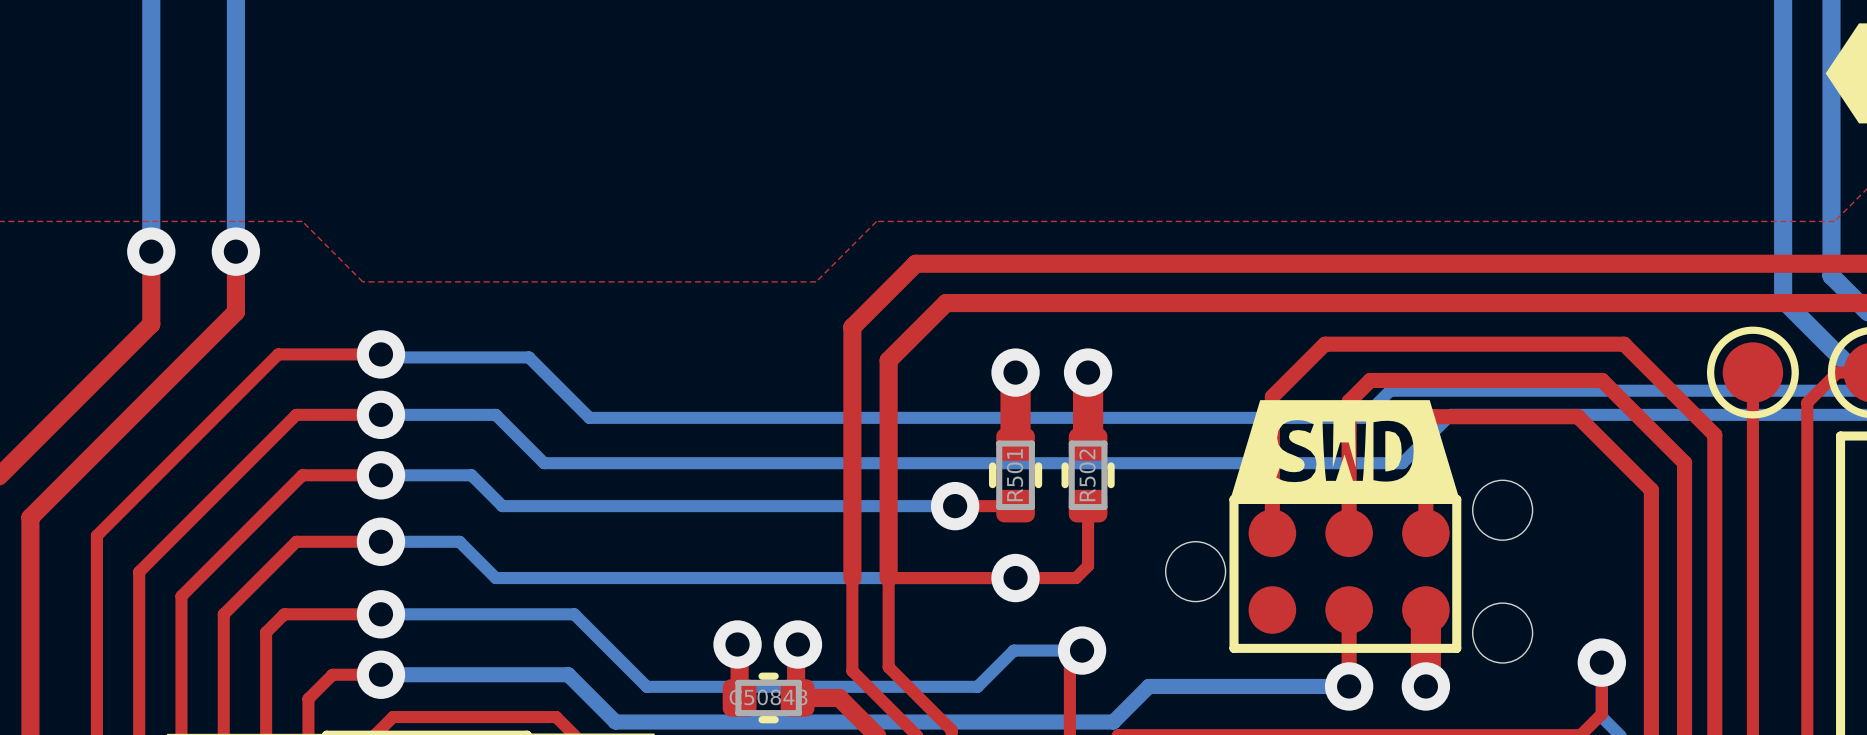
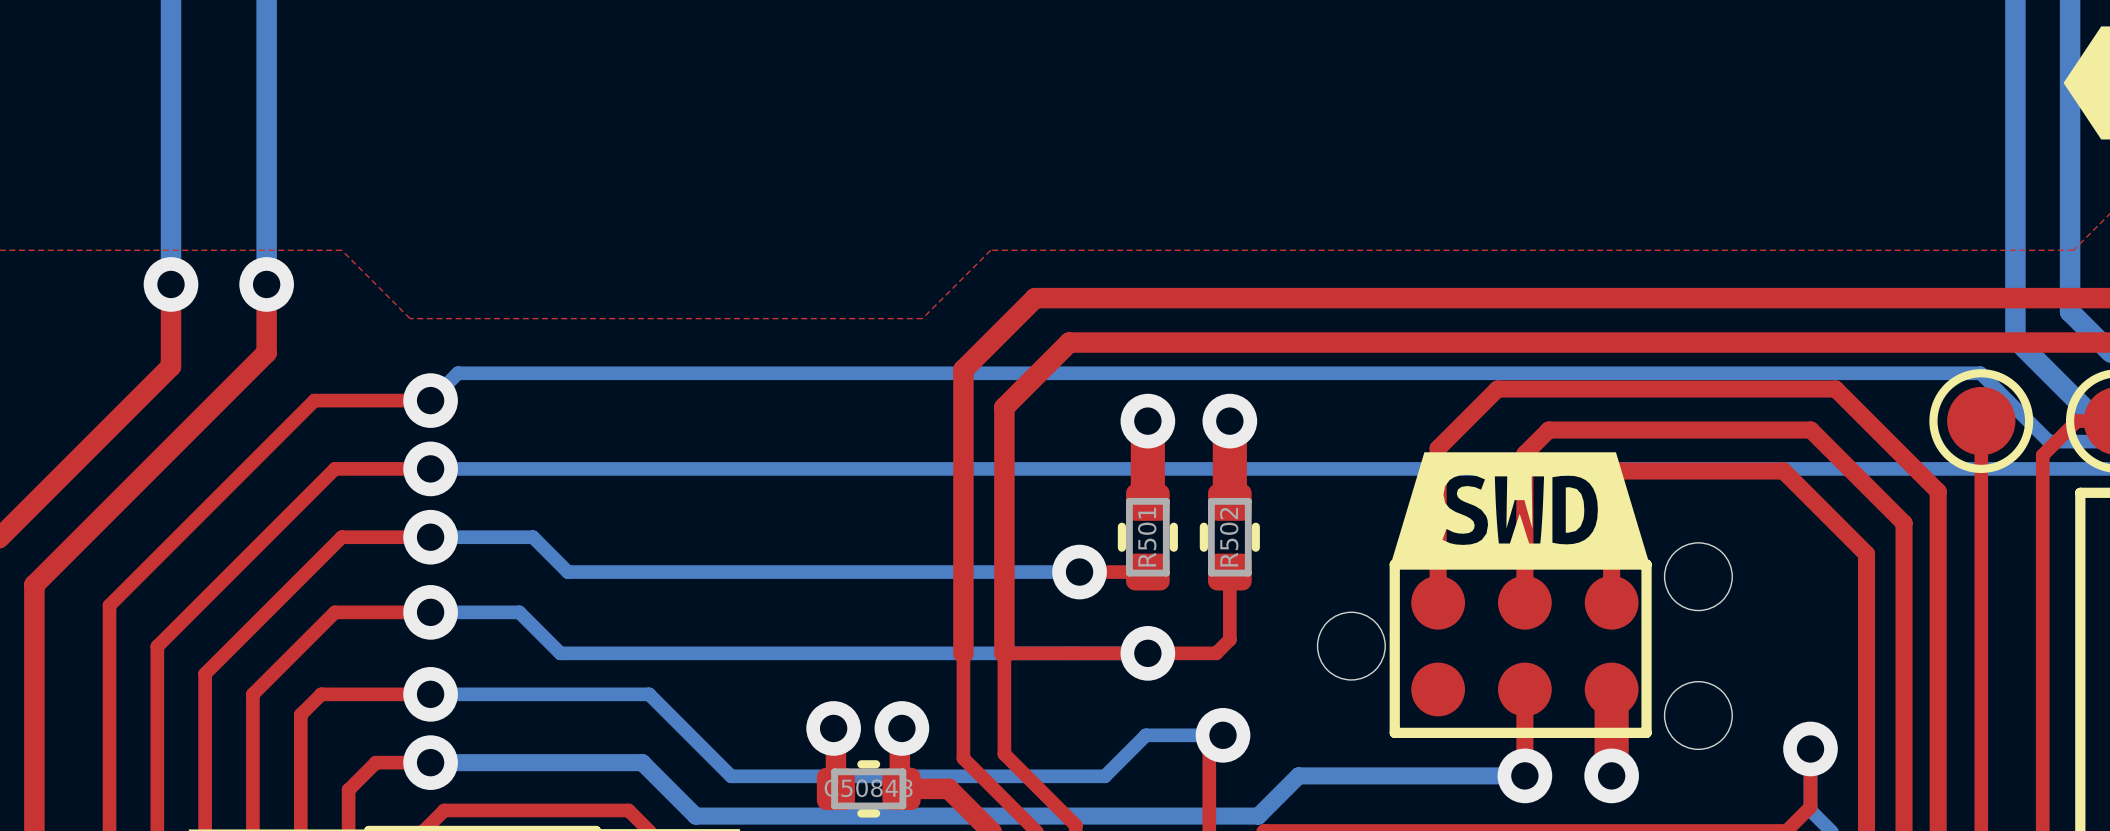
bottom track: (380, 354) (383, 357) (529, 357) (589, 417) (1363, 417) (1390, 390) (1812, 390) -> (430, 400) (457, 373) (1980, 373) (2048, 441)
bottom track: (495, 414) (544, 463) (1402, 463) (1450, 414) -> (560, 468) (1639, 468)

